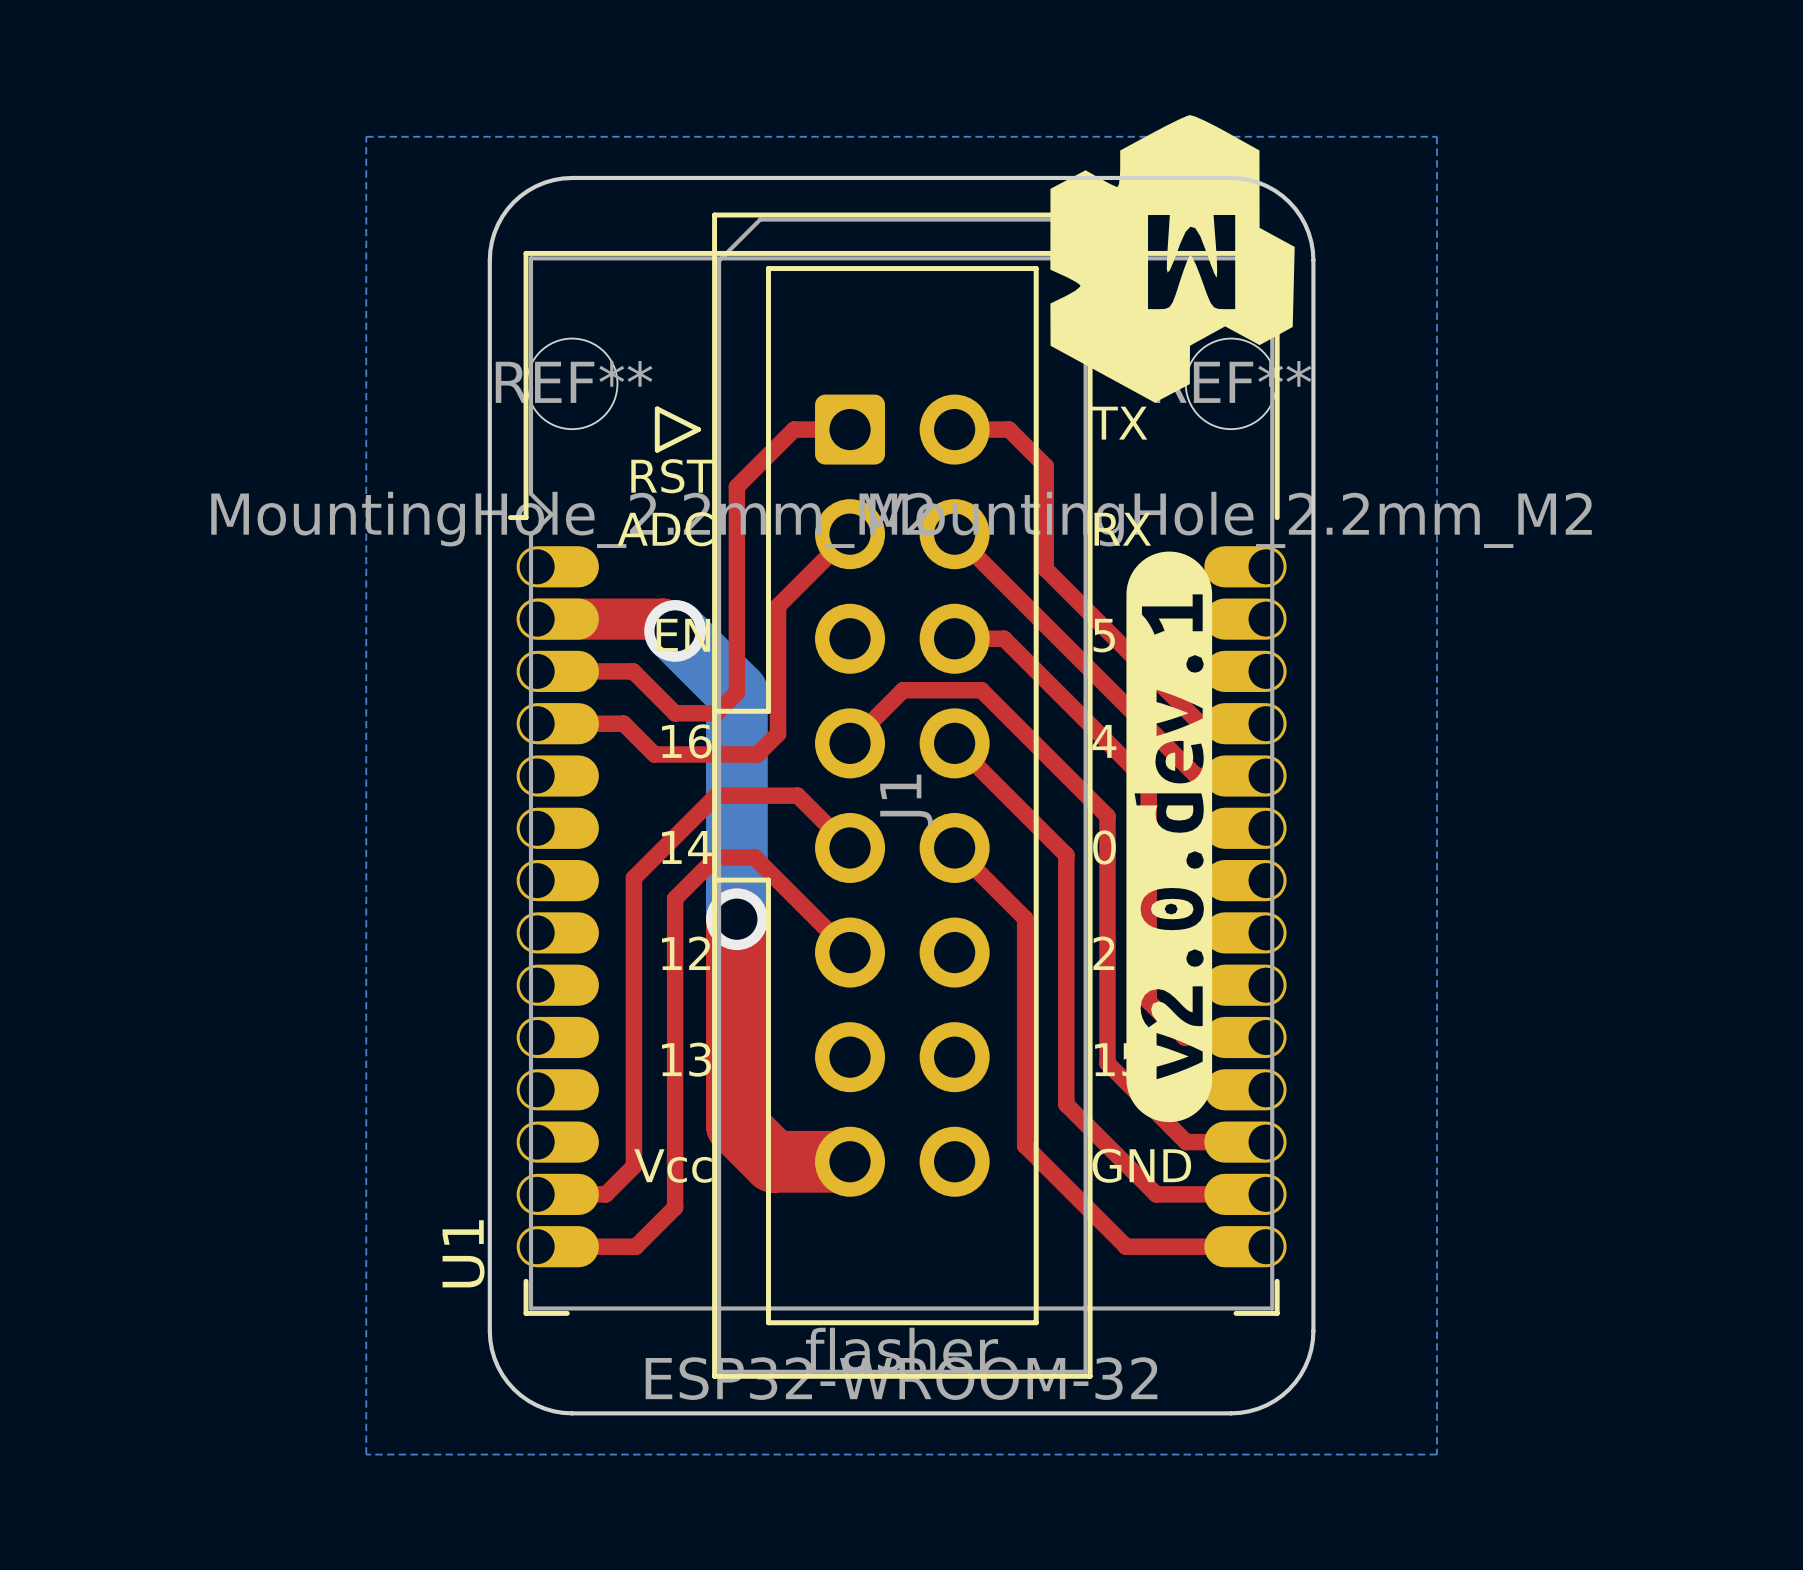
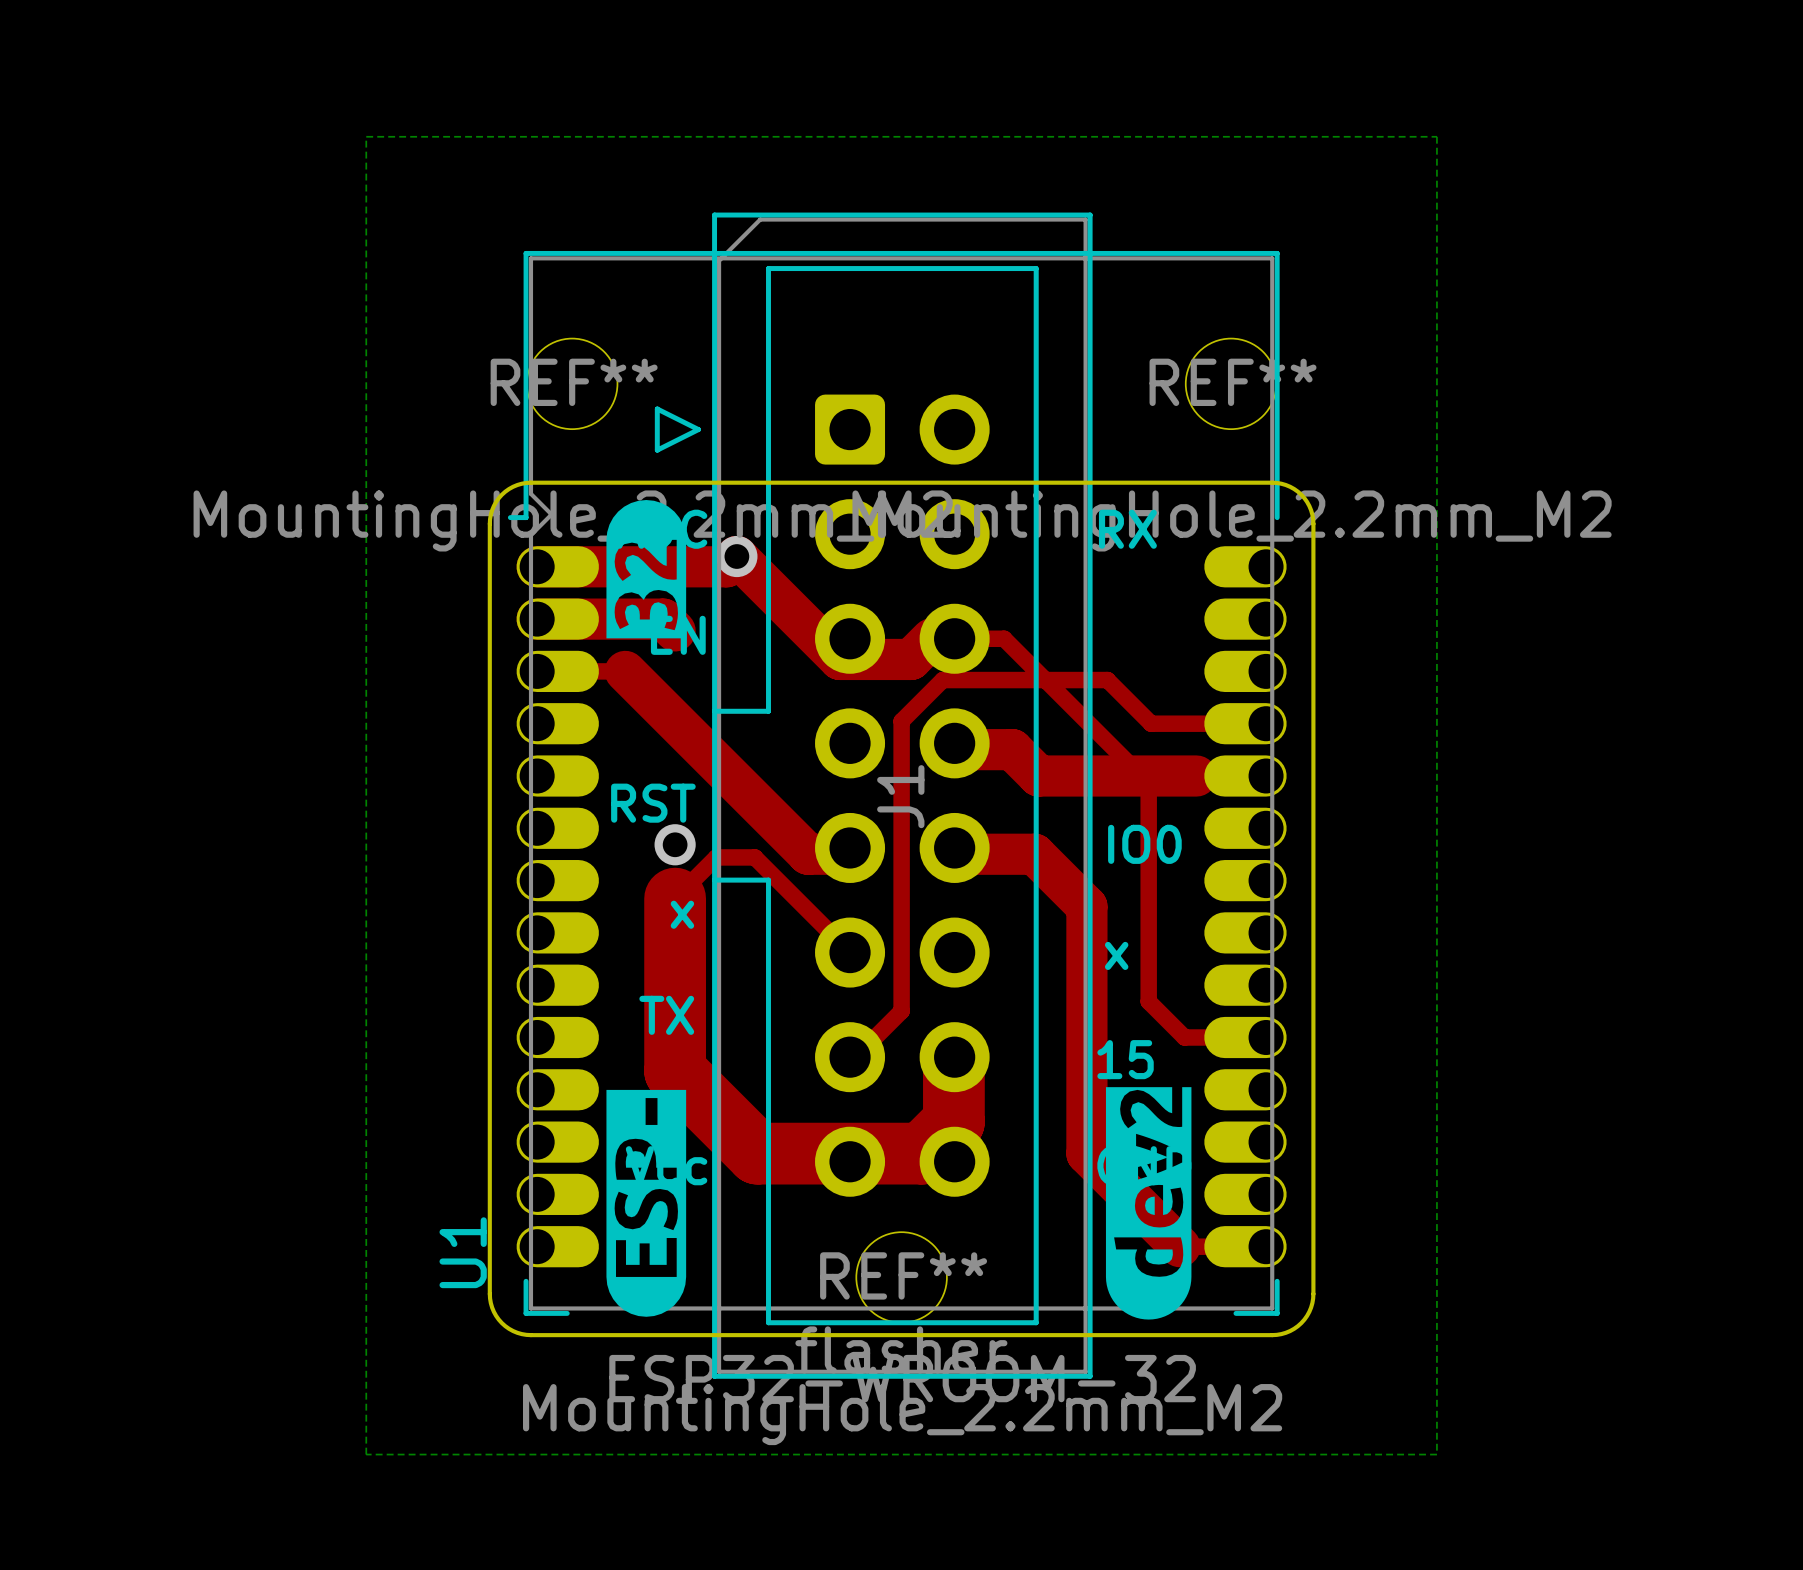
drawing: [1050, 115, 1295, 403] -> none
text position: TX (1118, 423) -> TX (666, 1015)
top track: (850, 429) (794, 429) (736, 486) (736, 692) (716, 713) (675, 713) (633, 671) (625, 671) -> (849, 854) (808, 854) (625, 671)
top track: (954, 429) (1009, 429) (1045, 466) (1045, 569) (1200, 723) -> (849, 1063) (901, 1011) (901, 721) (942, 680) (1107, 680) (1151, 723) (1200, 723)
text position: RST (672, 476) -> RST (653, 803)
drawing: none -> [606, 500, 687, 639]
board edge: (489, 523) (489, 260) (491, 241) (502, 216) (520, 195) (544, 182) (572, 177) (1231, 177) (1249, 180) (1266, 186) (1282, 195) (1300, 216) (1308, 233) (1312, 251) (1313, 523) -> (489, 523) (493, 506) (501, 494) (517, 485) (530, 482) (1272, 482) (1290, 486) (1301, 494) (1311, 510) (1313, 523)
top track: (850, 534) (778, 606) (778, 733) (757, 754) (654, 754) (623, 723) (537, 723) -> none
top track: (954, 534) (1196, 776) -> (953, 749) (1012, 749) (1038, 776) (1196, 776)
drawing: [1126, 551, 1213, 1123] -> none
via: none -> (736, 556)
top track: none -> (537, 566) (726, 566) (736, 556) (839, 659) (910, 659) (931, 638)
bottom track: (675, 630) (736, 692) (736, 919) -> none
via: (675, 630) -> none
text: 5 (1104, 635) -> none
text: 16 (686, 741) -> none
text: 4 (1104, 741) -> none
top track: (850, 743) (903, 690) (981, 690) (1107, 816) (1107, 1063) (1186, 1142) (1266, 1142) -> none
top track: (954, 743) (1066, 855) (1066, 1104) (1156, 1194) (1266, 1194) -> none
via: none -> (675, 844)
text: 14 (687, 847) -> none
top track: (850, 847) (797, 795) (716, 795) (633, 878) (633, 1166) (605, 1194) (537, 1194) -> none
top track: (954, 847) (1025, 918) (1025, 1145) (1126, 1246) (1179, 1246) -> (953, 854) (1034, 854) (1086, 906) (1086, 1153) (1179, 1246)
text: 0 (1104, 847) -> IO0 (1144, 844)
top track width: thin (675, 898) (675, 1071) -> thick (675, 898) (675, 1071)
text: none -> x (682, 914)
top track: (736, 919) (736, 1125) (773, 1161) (850, 1161) -> none
via: (736, 919) -> none
text: 12 (686, 953) -> none
text: 2 (1103, 953) -> x (1116, 955)
text: 13 (686, 1059) -> none
top track: (675, 1071) (675, 1207) (635, 1246) (537, 1246) -> (675, 1071) (757, 1153) (922, 1153) (953, 1121) (953, 1063)
drawing: none -> [1105, 1087, 1192, 1320]
drawing: none -> [606, 1089, 687, 1317]
REF**: none -> MountingHole_2.2mm_M2 (901, 1277)
board edge: (489, 1293) (490, 1340) (494, 1358) (502, 1374) (513, 1389) (528, 1400) (553, 1411) (572, 1413) (1240, 1412) (1258, 1408) (1274, 1400) (1289, 1389) (1300, 1374) (1308, 1358) (1312, 1340) (1313, 1293) -> (489, 1293) (492, 1307) (501, 1323) (517, 1332) (530, 1335) (1272, 1335) (1290, 1331) (1301, 1323) (1309, 1311) (1313, 1293)

